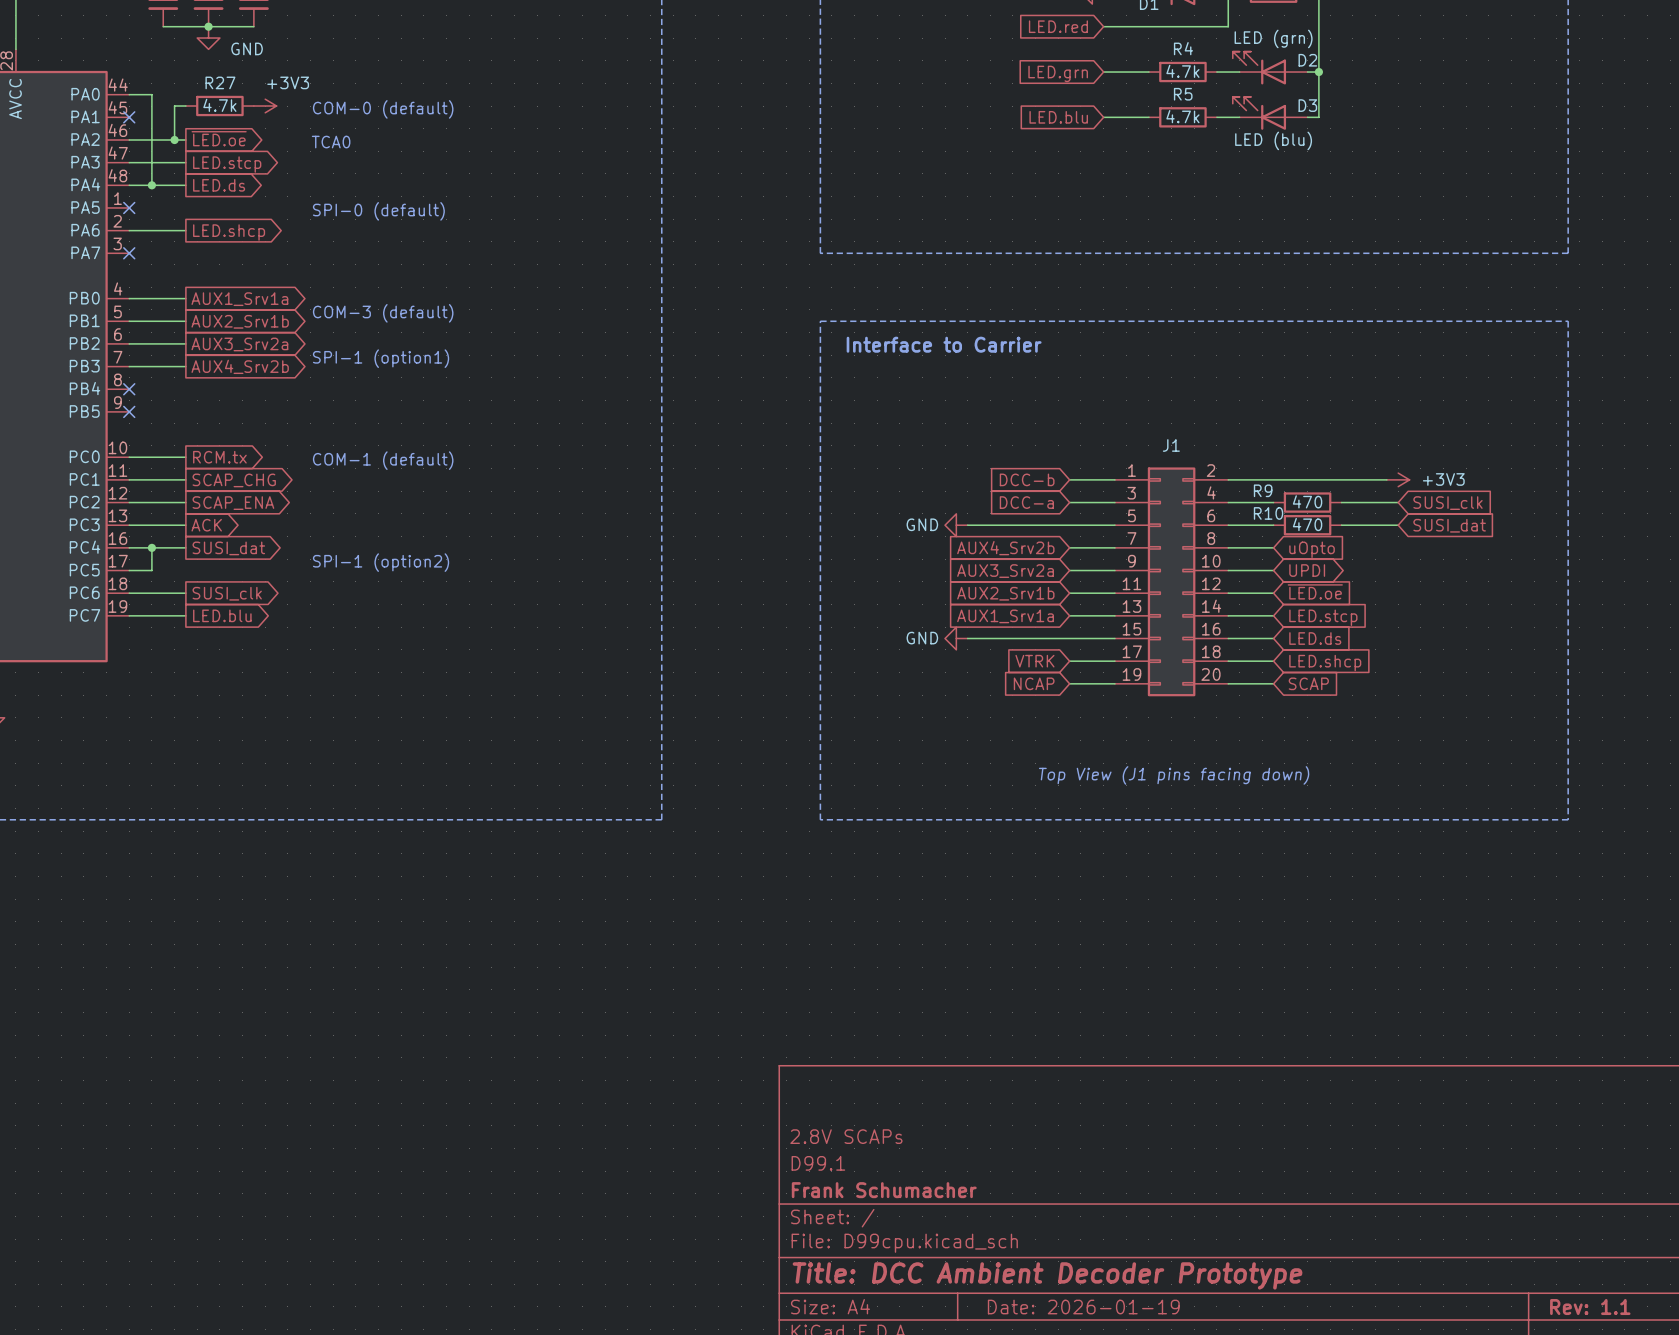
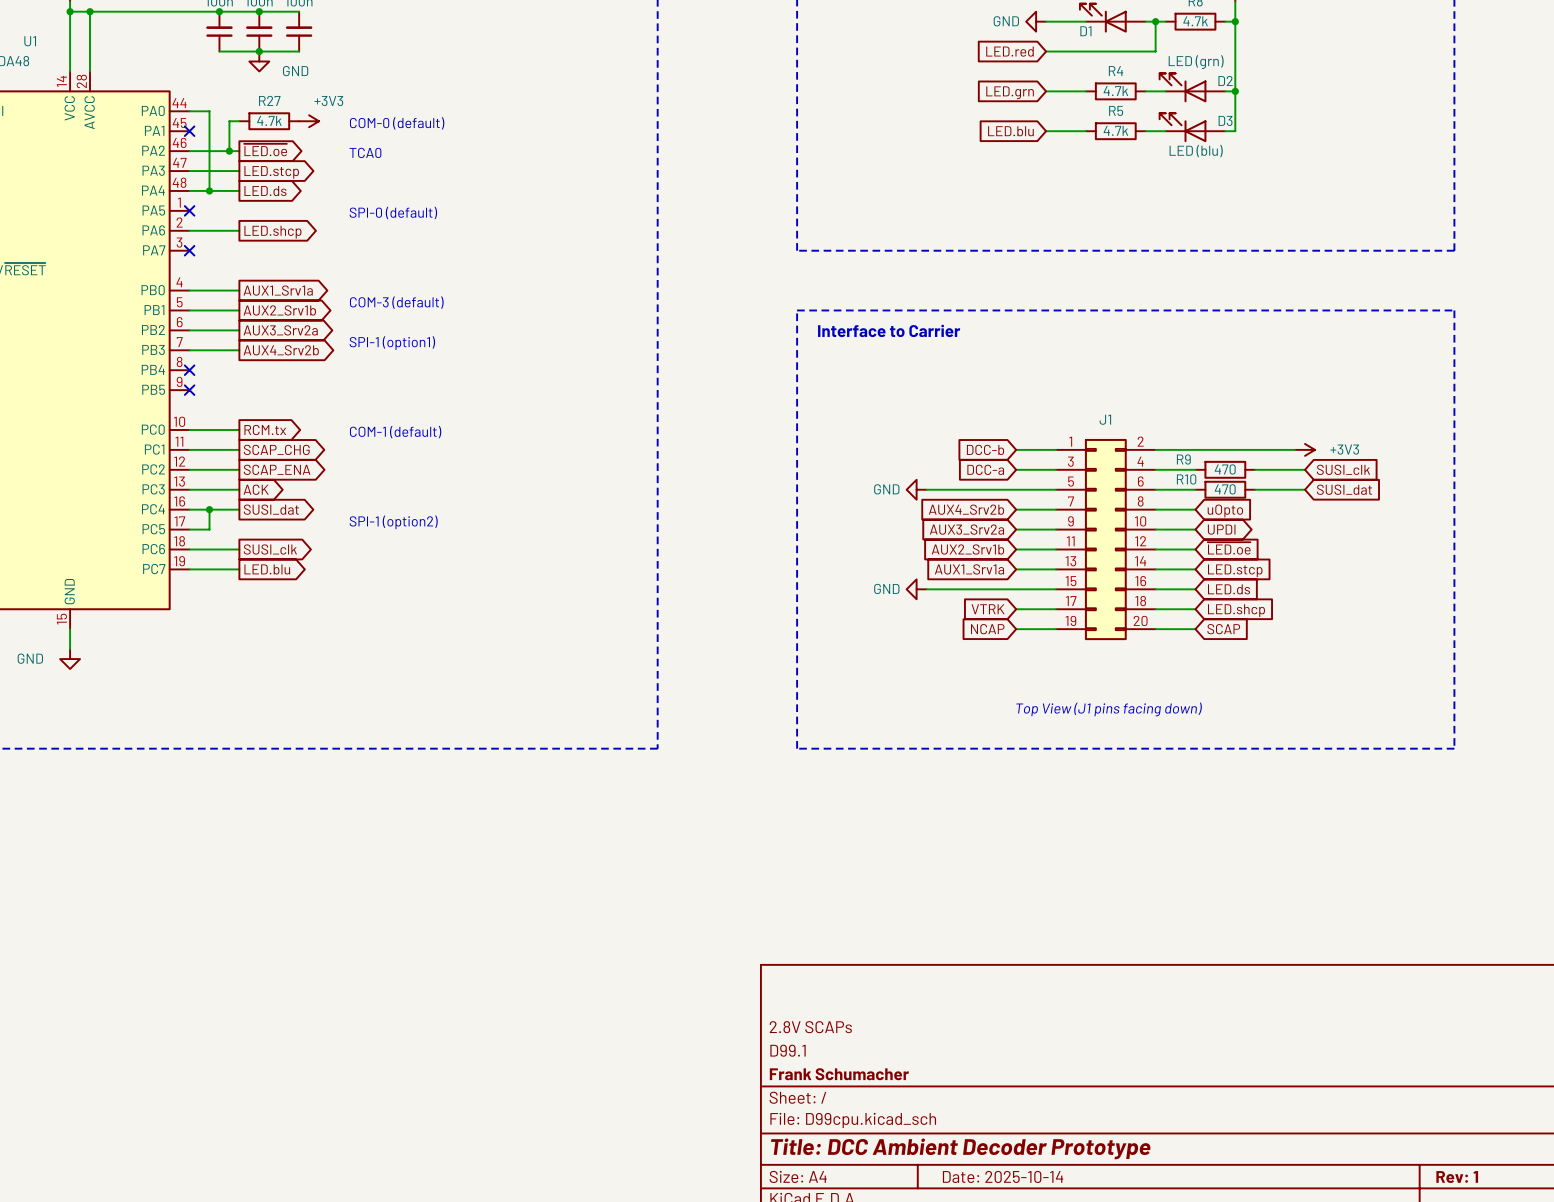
title block: Date: 2026-01-19 (1083, 1307) -> Date: 2025-10-14 (1003, 1176)
title block: Rev: 1.1 (1590, 1307) -> Rev: 1 (1457, 1177)

